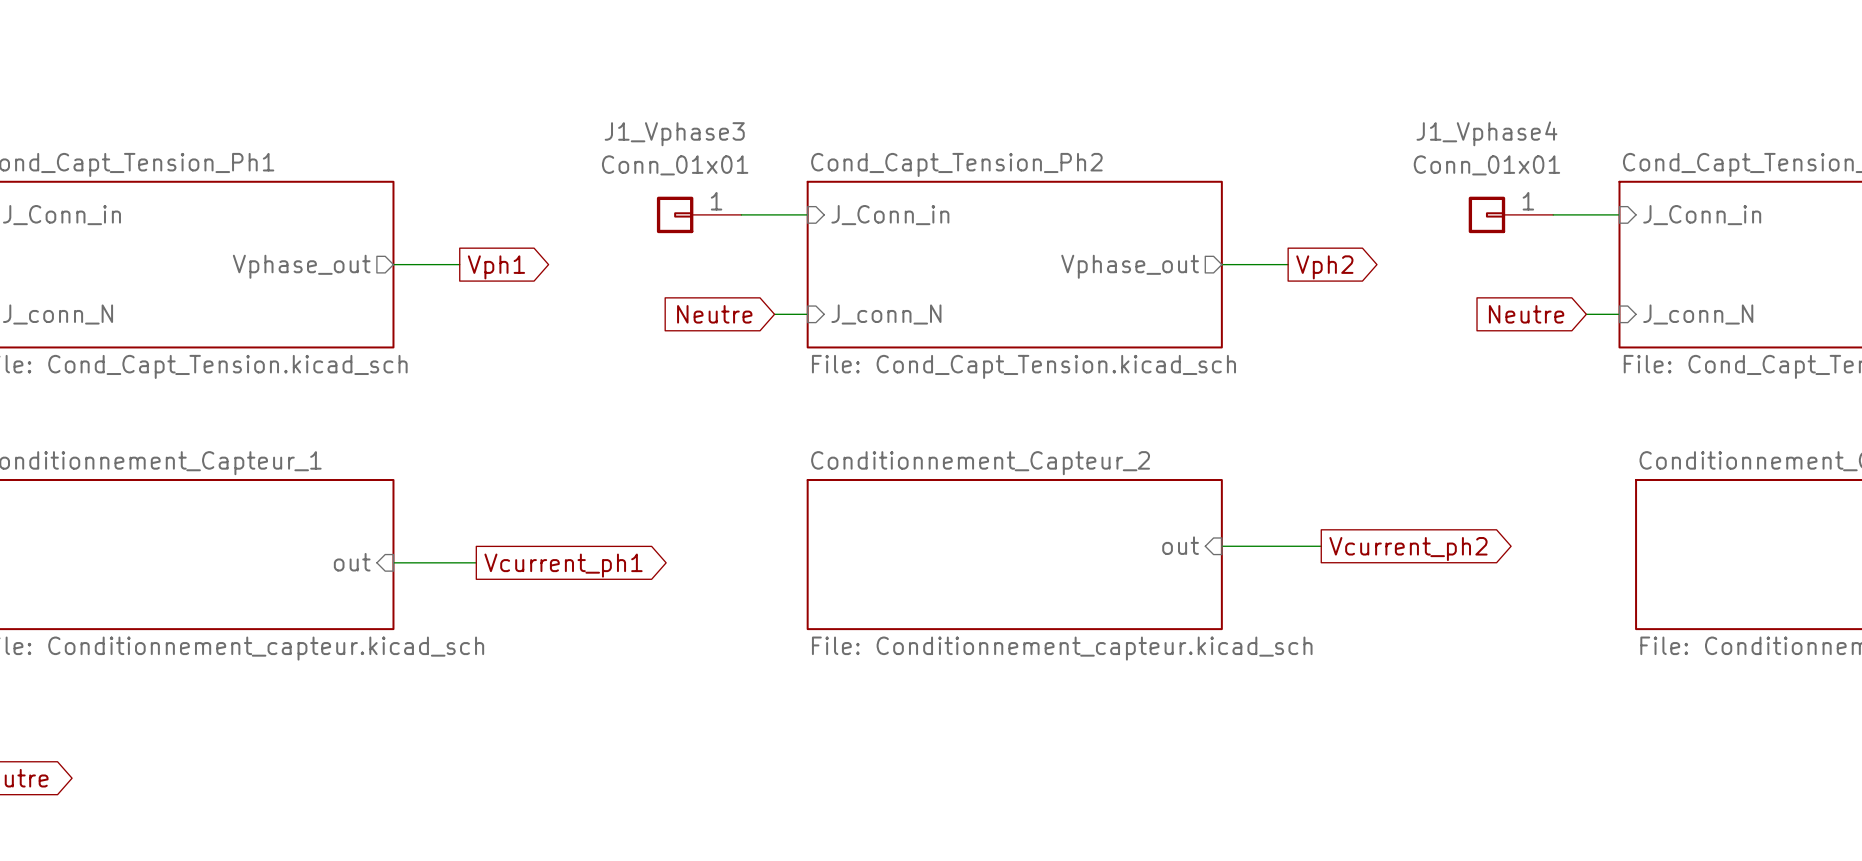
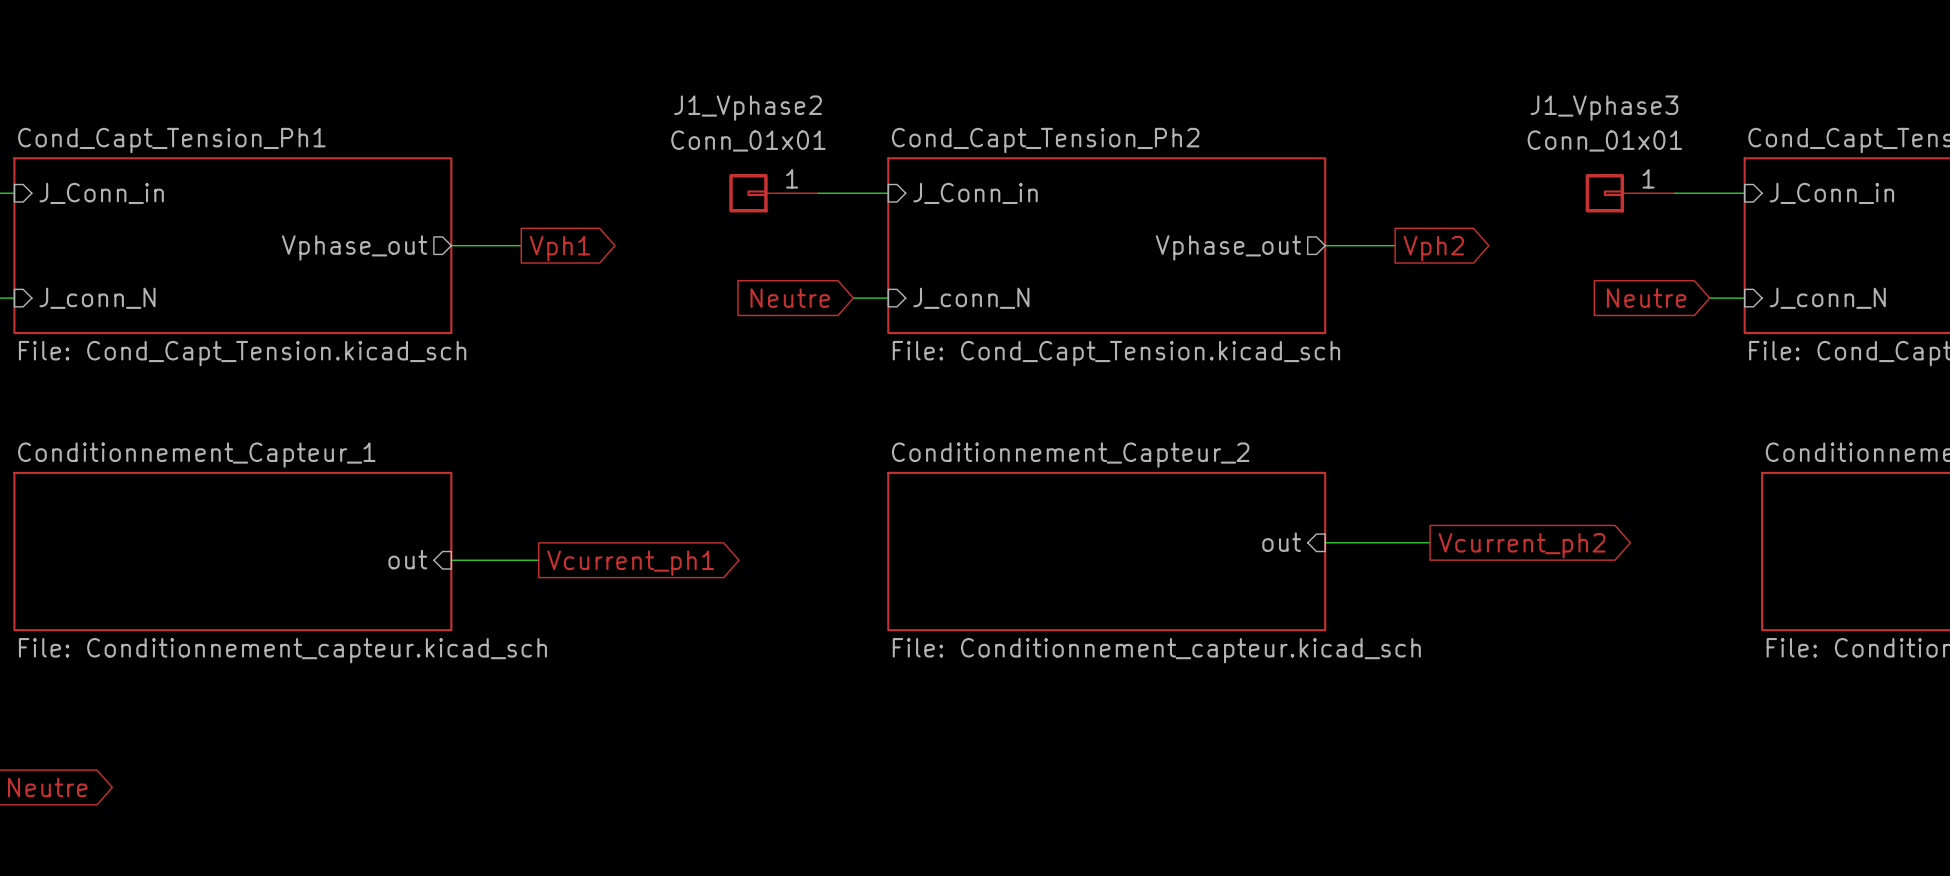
J1_Vphase4 name: J1_Vphase4 (1486, 133) -> J1_Vphase3 (1604, 108)
J1_Vphase3 name: J1_Vphase3 (674, 134) -> J1_Vphase2 (748, 108)

